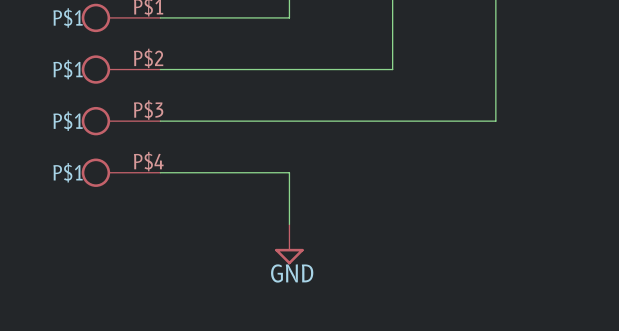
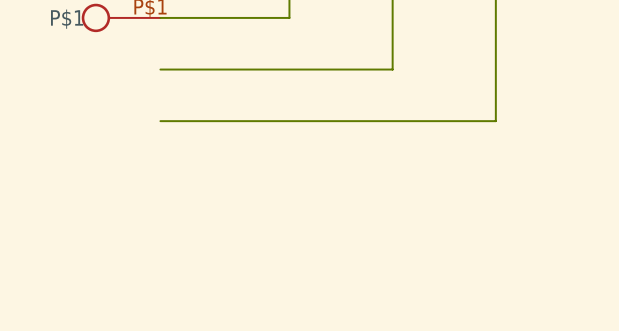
part: (121, 69) -> none
part: (121, 121) -> none
part: (121, 172) -> none
wire: (160, 172) (289, 172) (289, 224) -> none
power symbol: GND (289, 244) -> none

